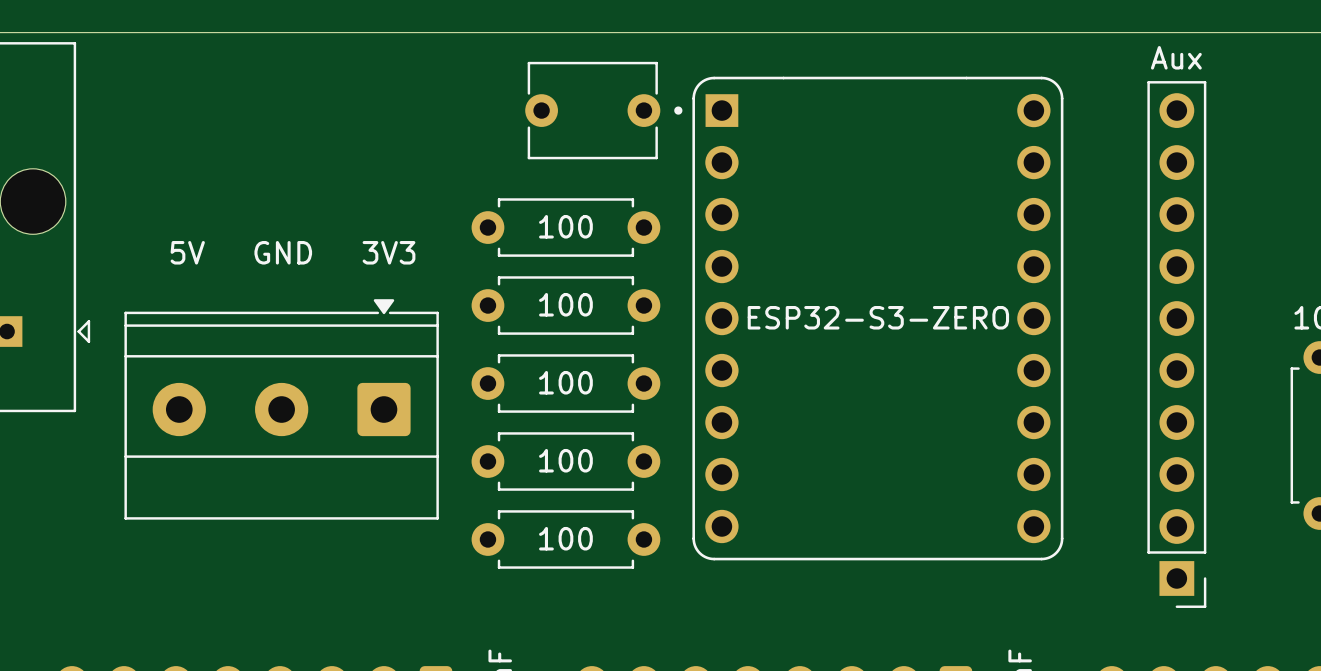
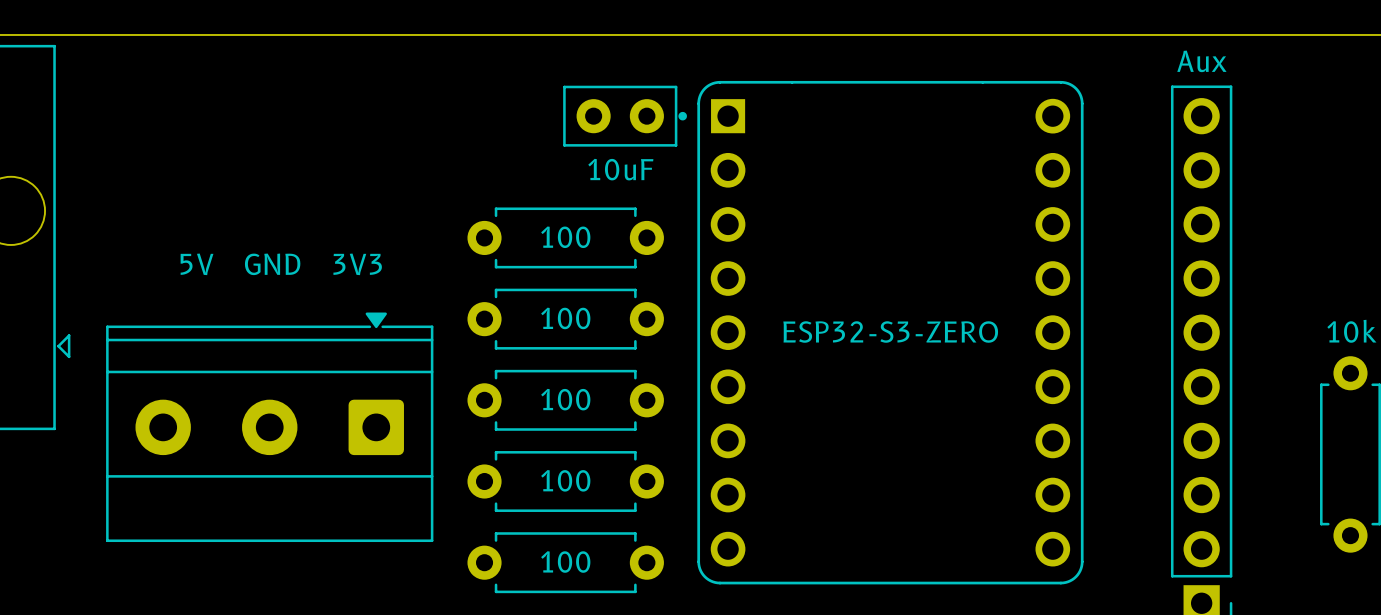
part: (592, 110) -> none
part: none -> 10uF (620, 116)

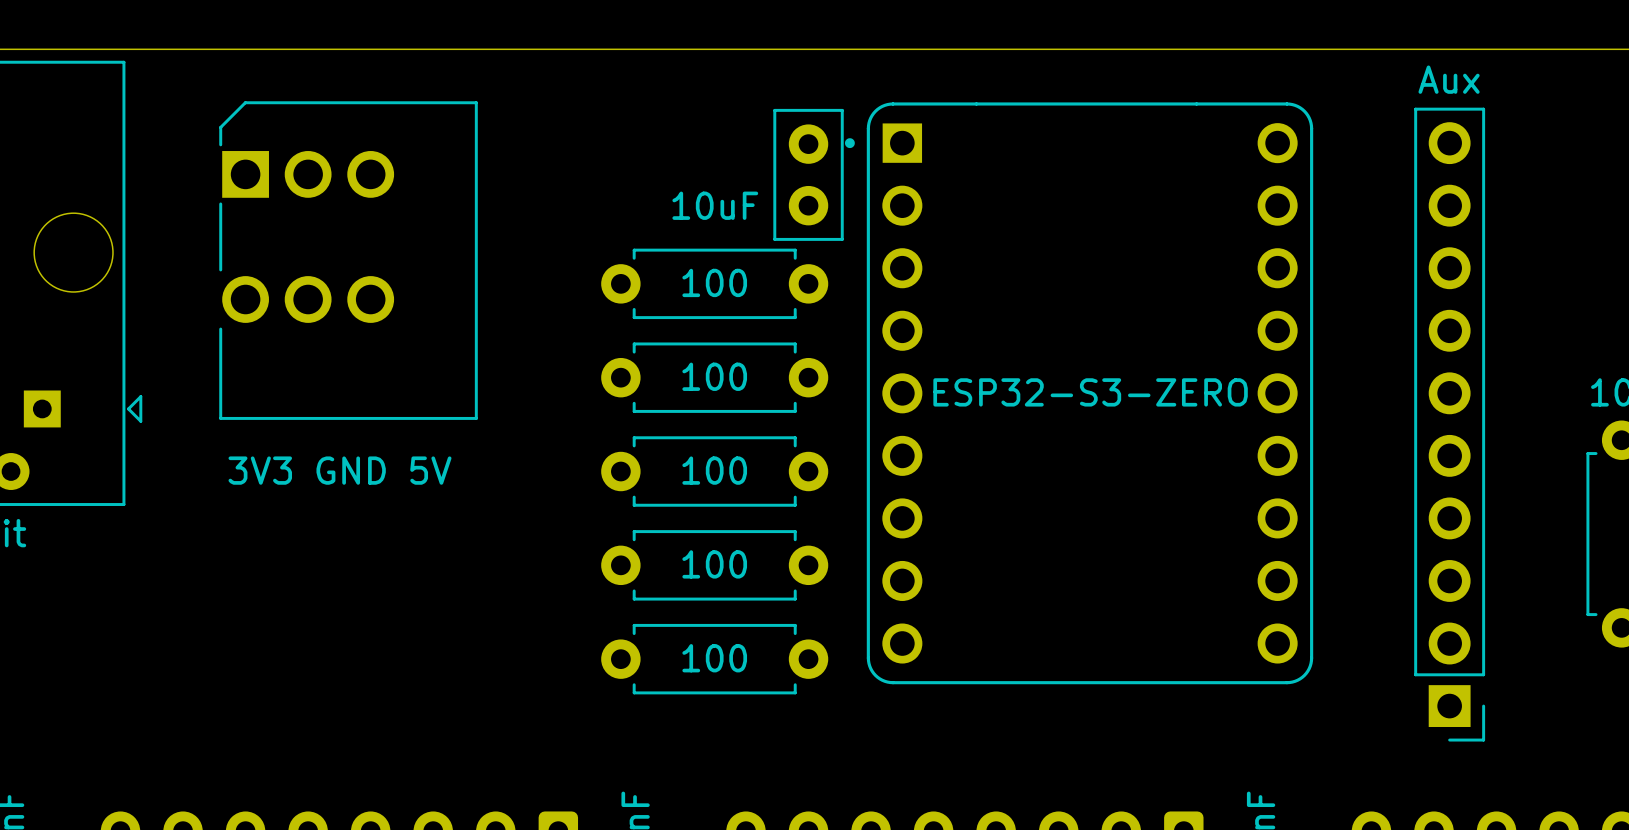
part rotation: 0° (620, 116) -> 90° clockwise (808, 174)
part: none -> (348, 260)
text: 5V GND 3V3 (281, 264) -> none
text: none -> 3V3 GND 5V (340, 470)
part: (269, 427) -> none

